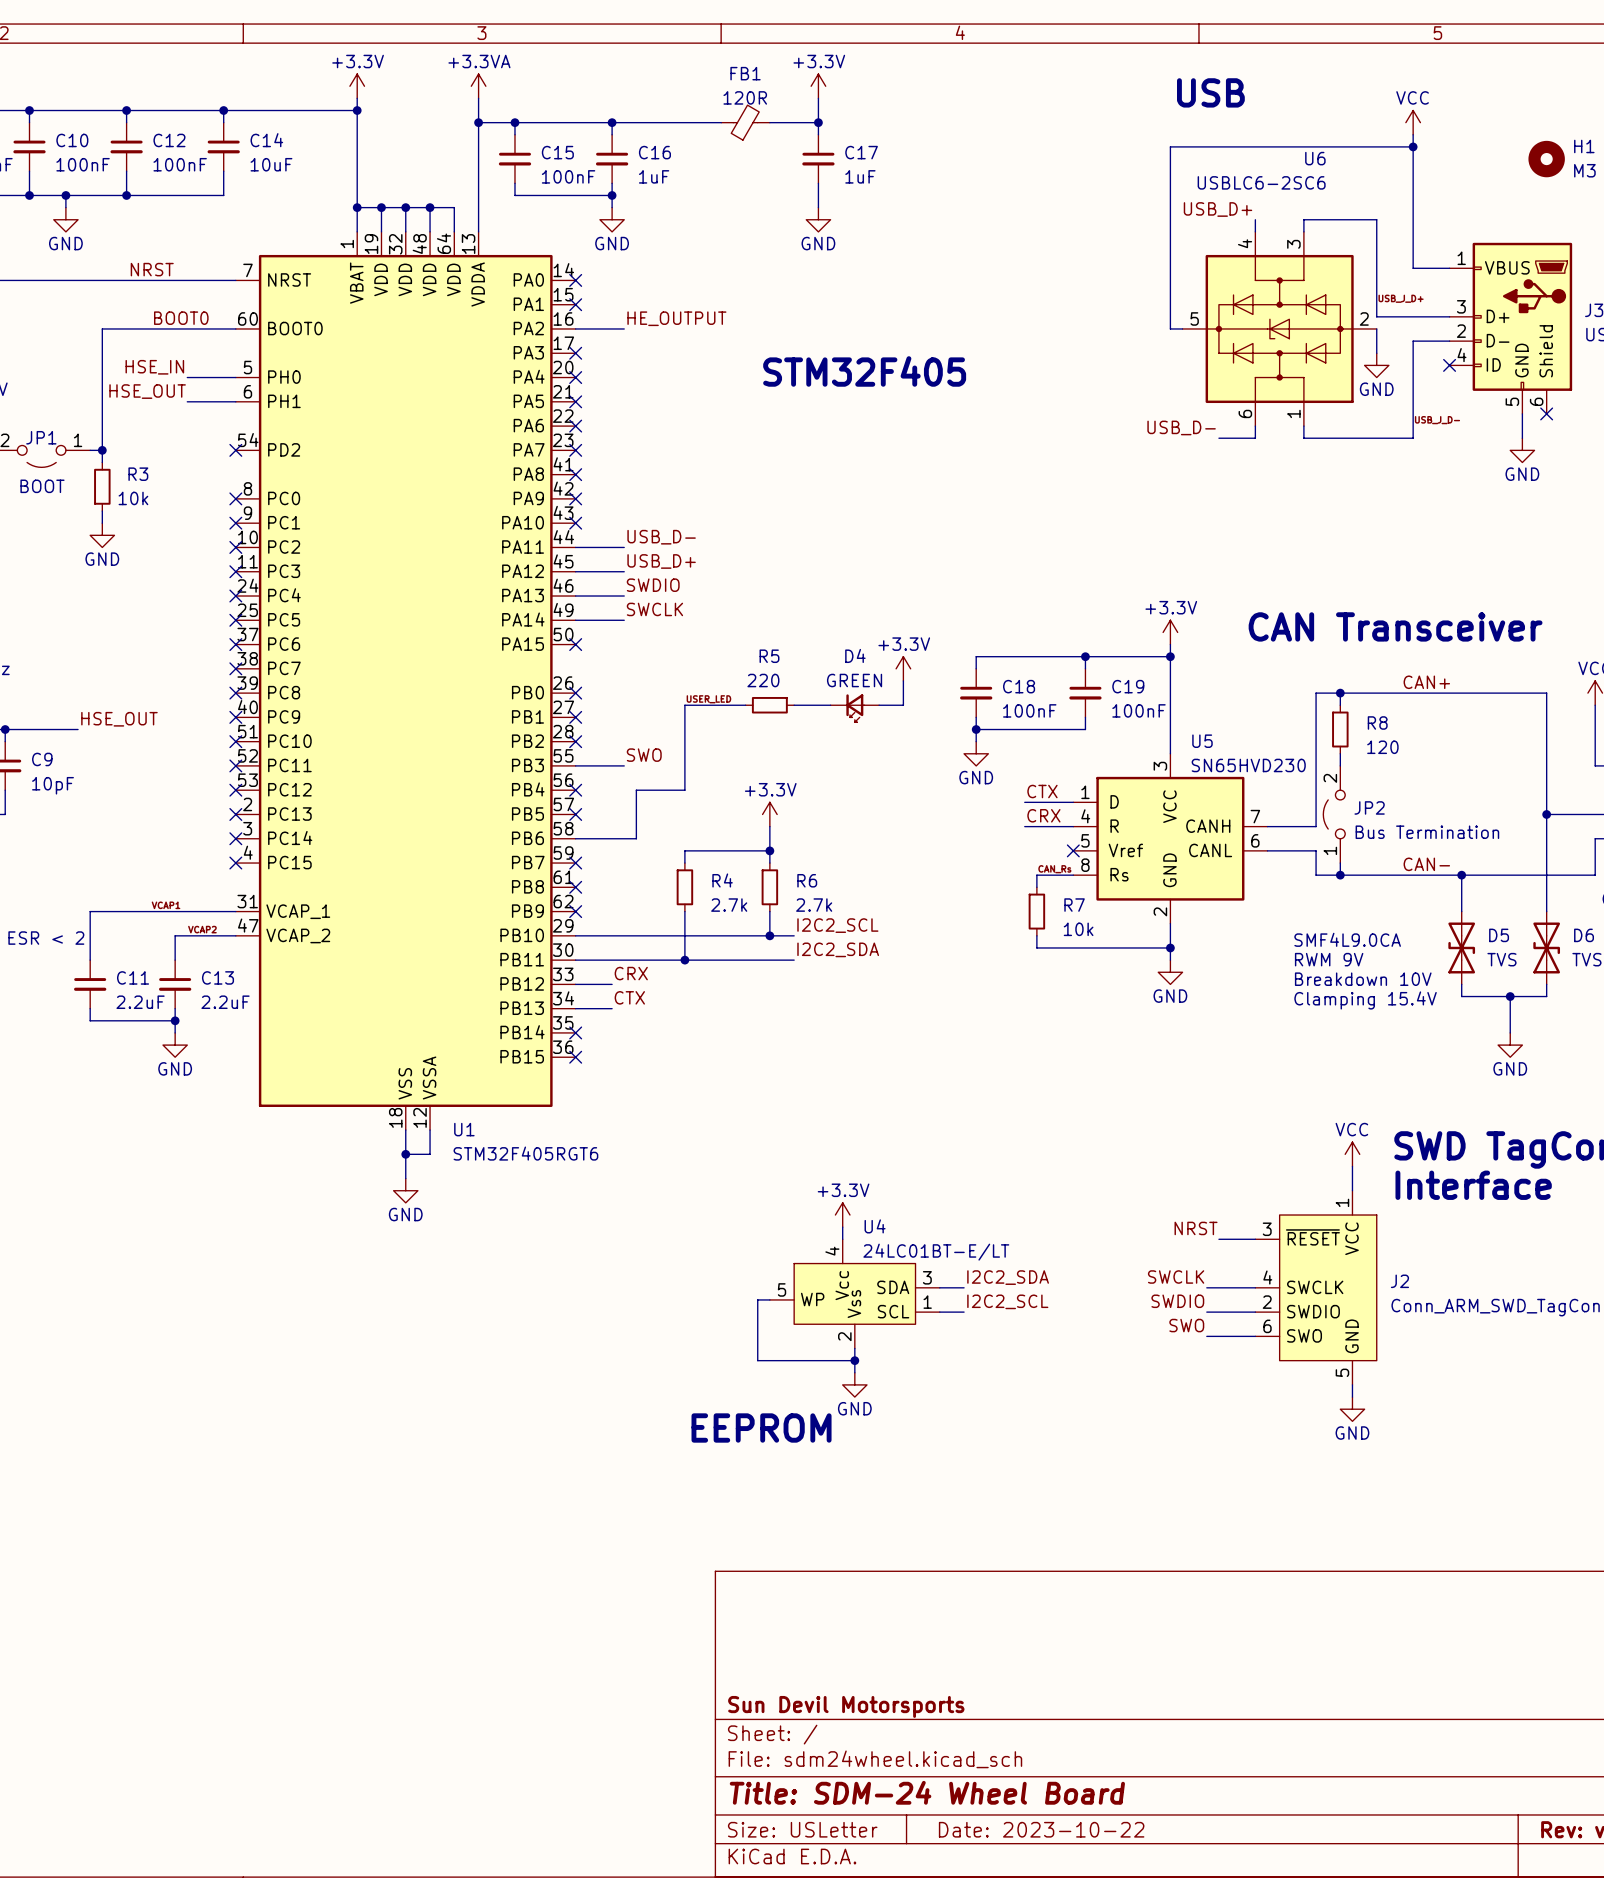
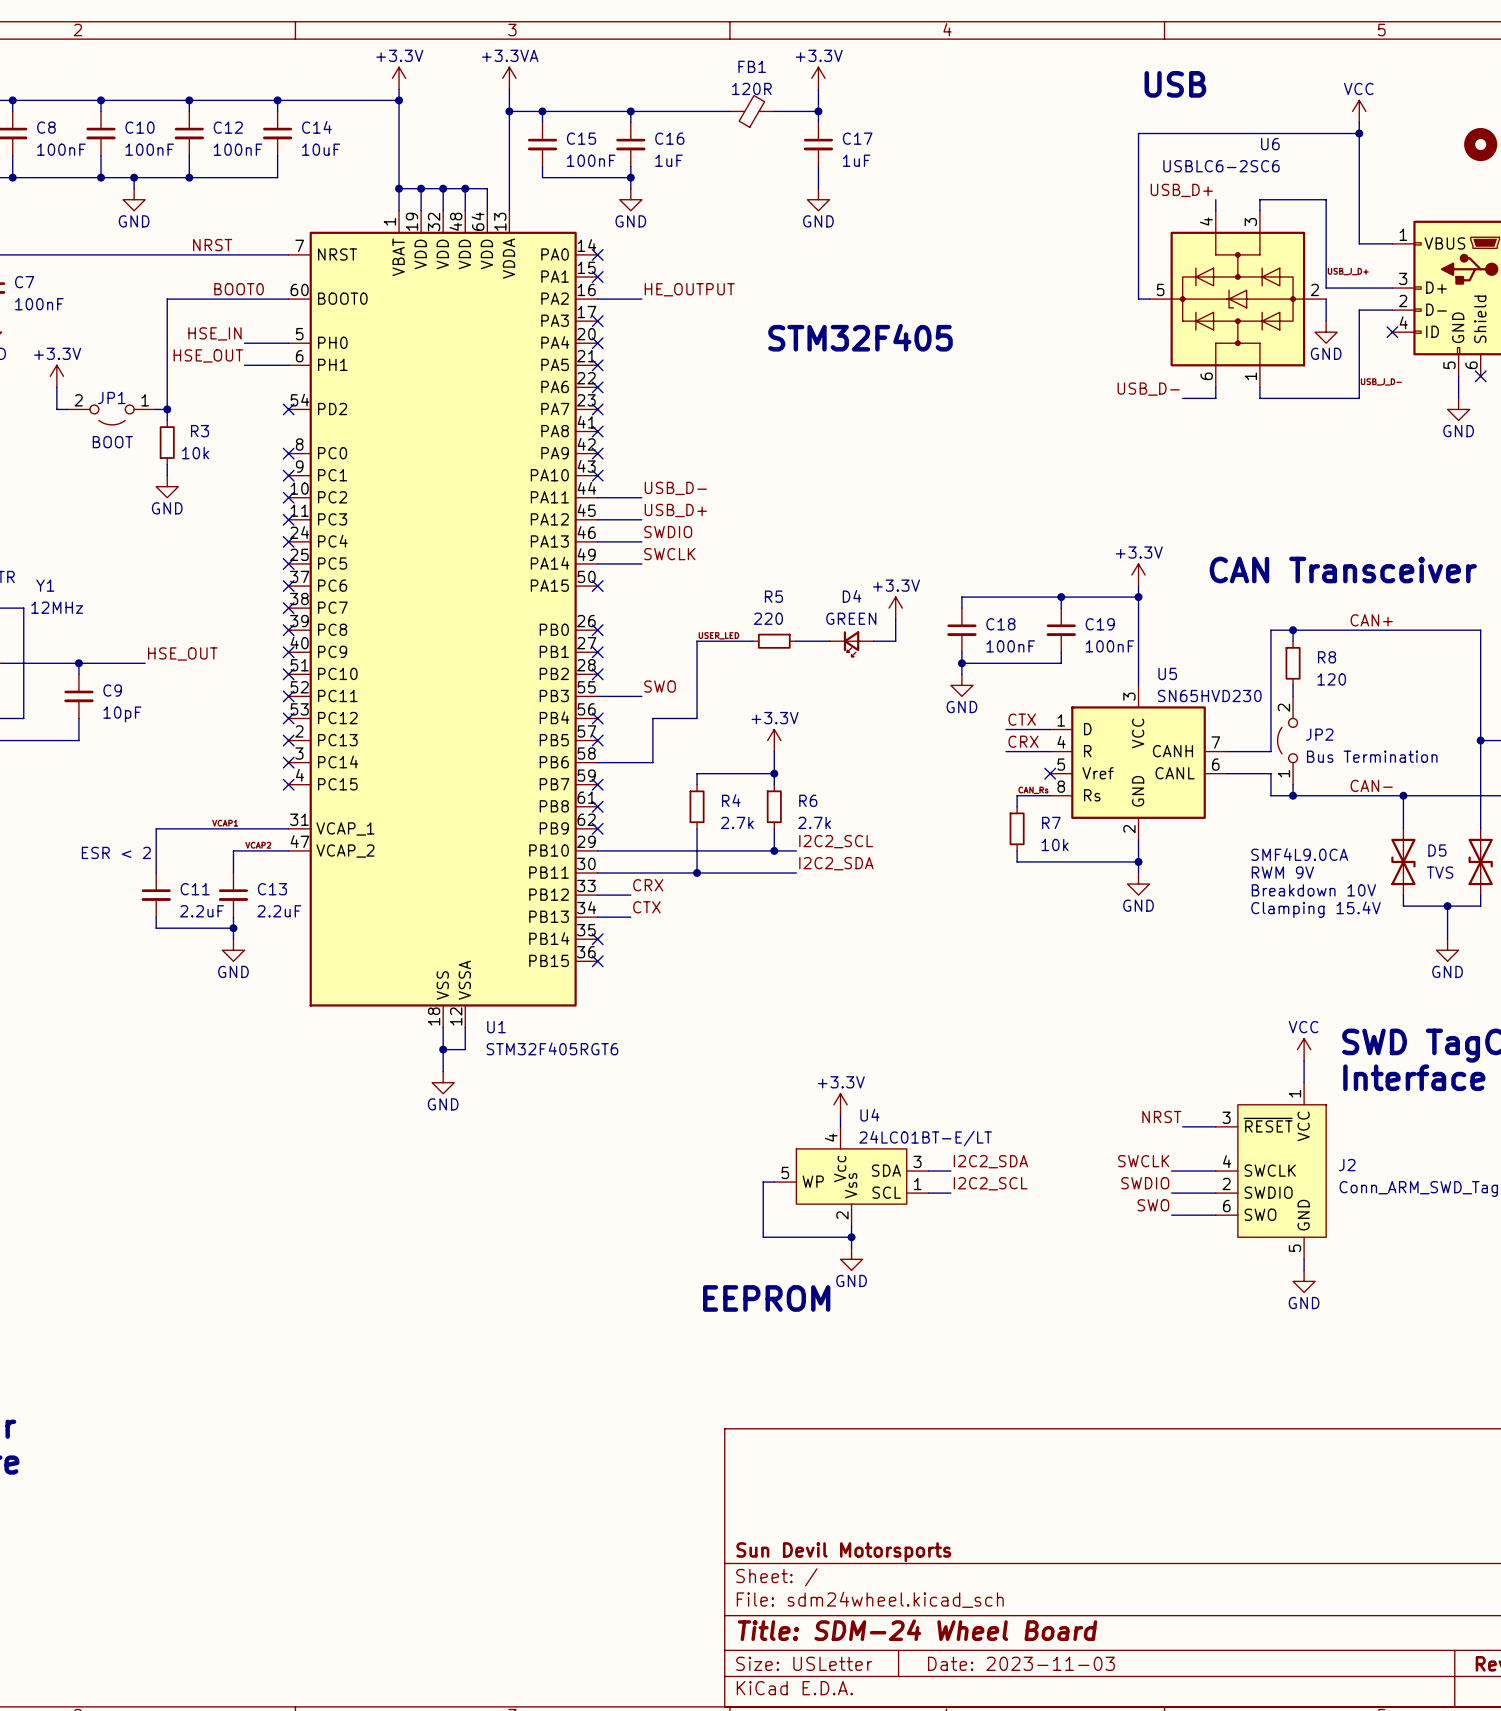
title block: Date: 2023-10-22 (1041, 1829) -> Date: 2023-11-03 (1021, 1663)

